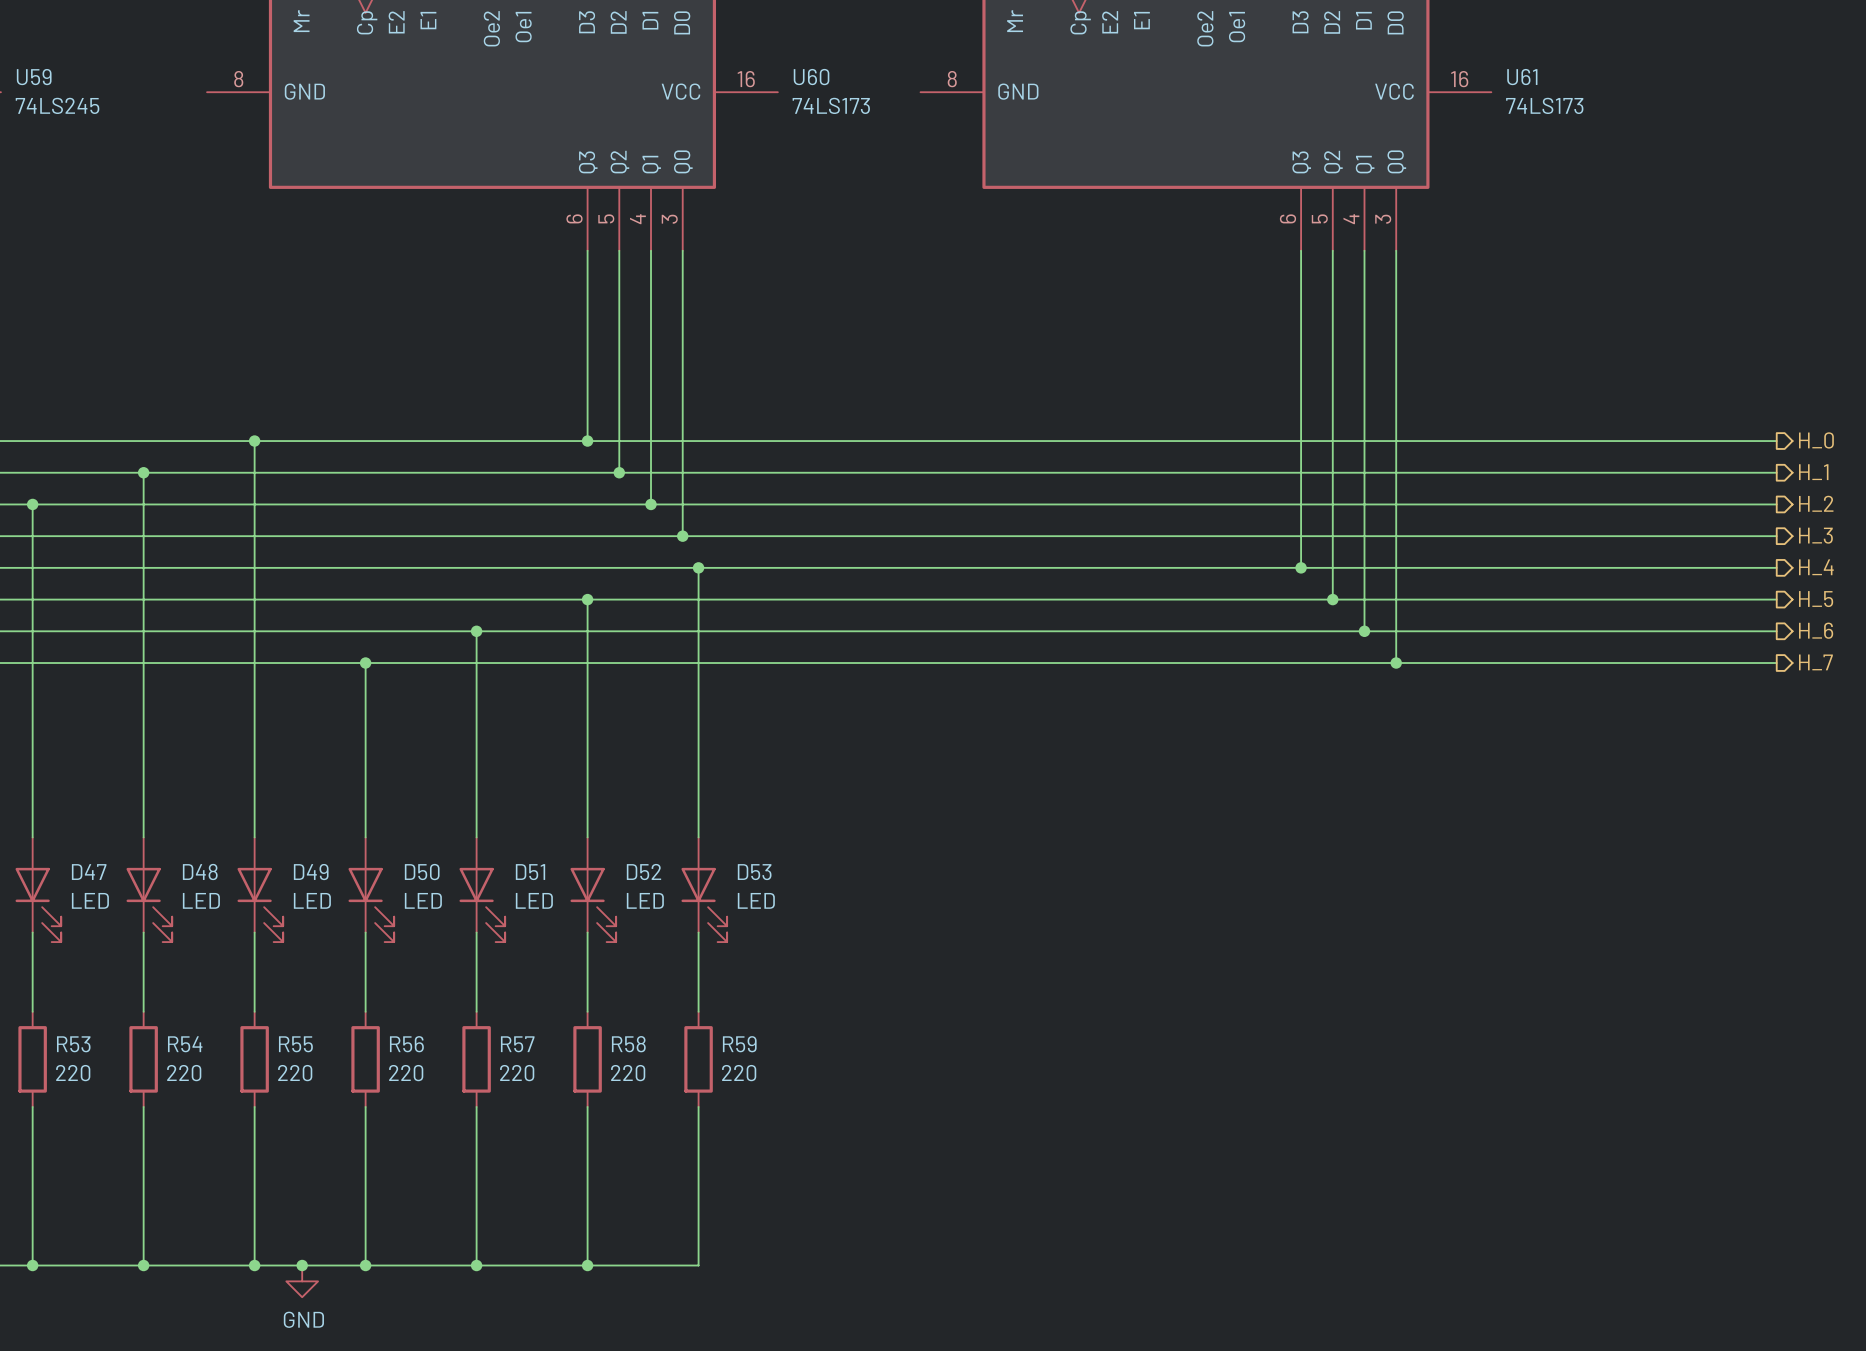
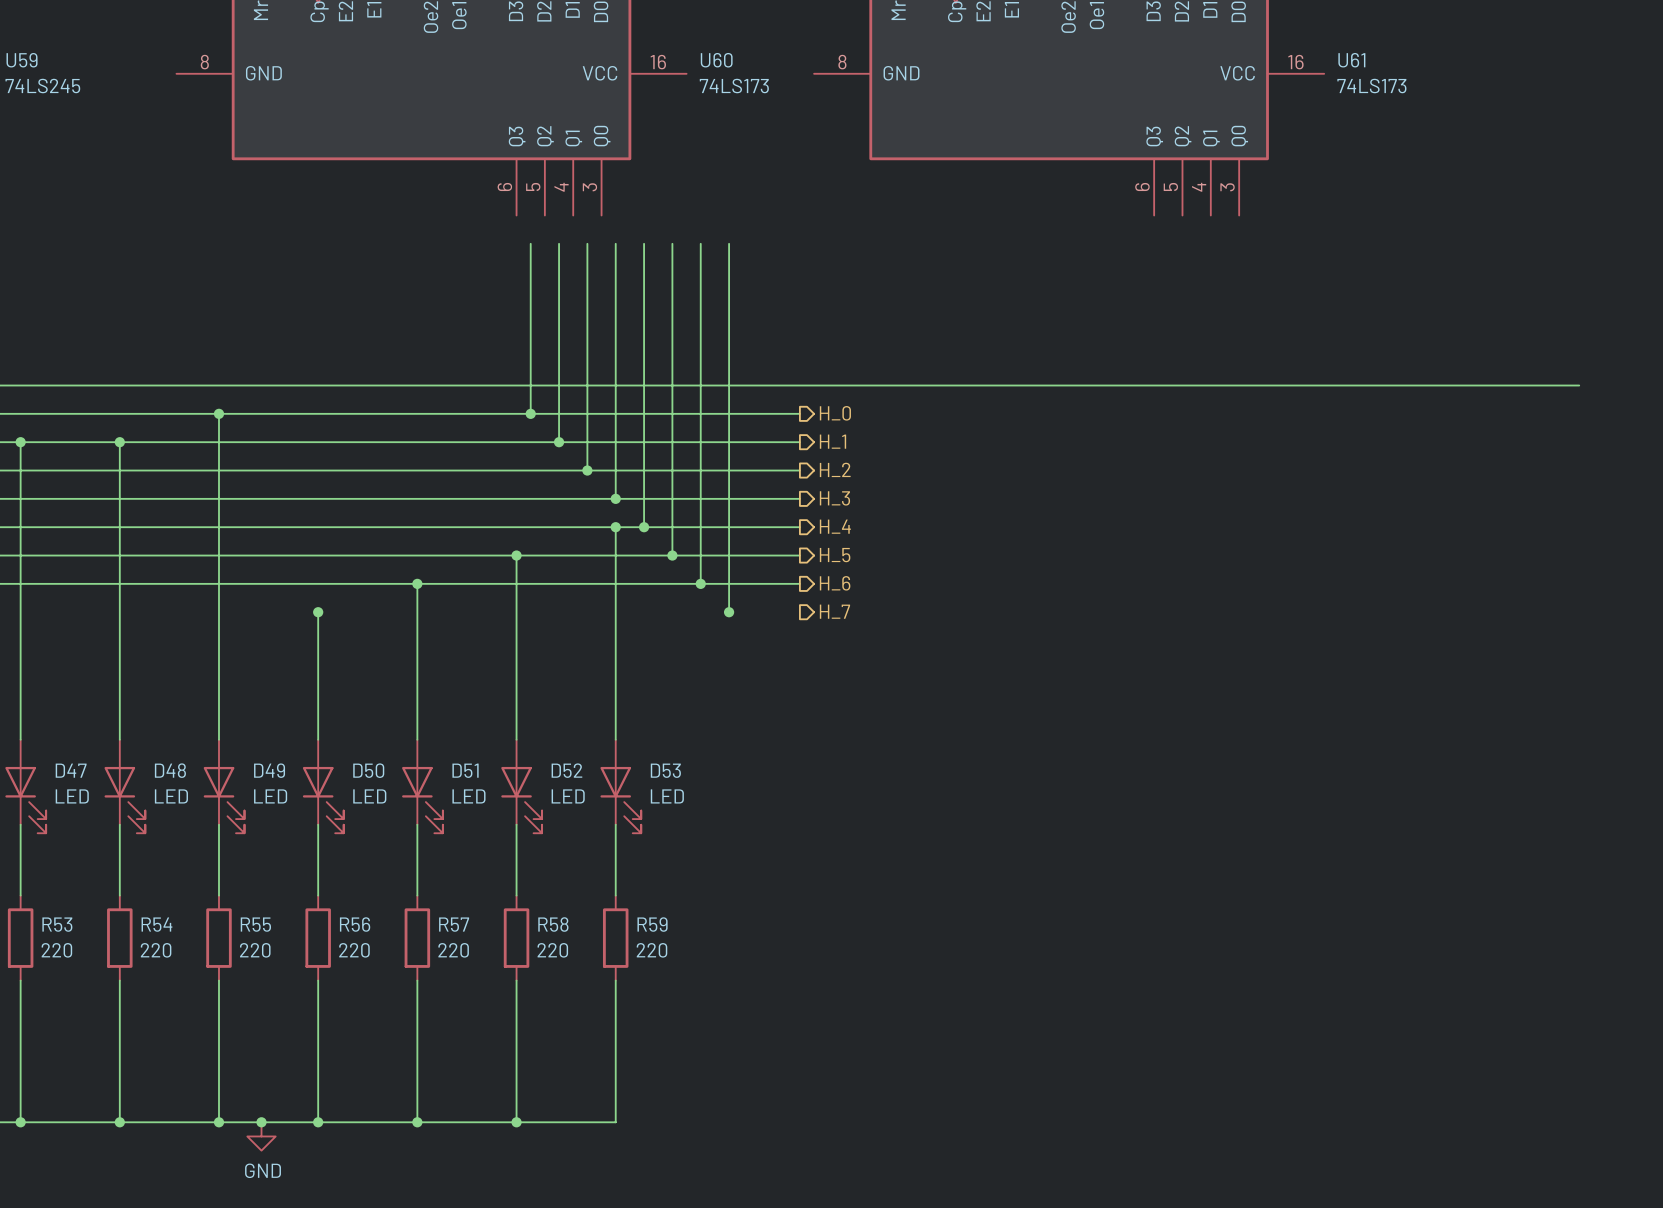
wire: (587, 250) (587, 441) -> (530, 243) (530, 413)
wire: (619, 250) (619, 472) -> (559, 243) (559, 442)
wire: (651, 250) (651, 504) -> (587, 243) (587, 470)
wire: (682, 250) (682, 536) -> none
wire: (1301, 250) (1301, 567) -> none
wire: (1332, 250) (1332, 599) -> none
wire: (1364, 250) (1364, 631) -> none
wire: (1396, 250) (1396, 663) -> none
wire: none -> (644, 243) (644, 527)
wire: none -> (672, 243) (672, 555)
wire: none -> (700, 243) (700, 583)
wire: none -> (729, 243) (729, 612)
hierarchical label: H_0 (1816, 440) -> none
wire: (254, 441) (254, 472) -> none
junction position: (254, 441) -> (219, 413)
junction: (587, 441) -> none
wire: (143, 472) (143, 504) -> none
junction position: (143, 472) -> (119, 442)
junction position: (619, 472) -> (530, 413)
wire: (904, 472) (1776, 472) -> none
hierarchical label: none -> H_0 (835, 413)
hierarchical label: H_1 (1813, 472) -> none
hierarchical label: none -> H_1 (832, 441)
hierarchical label: H_2 (1816, 503) -> none
junction position: (651, 504) -> (559, 442)
wire: (904, 504) (1776, 504) -> none
hierarchical label: none -> H_2 (835, 469)
hierarchical label: H_3 (1815, 535) -> none
junction position: (682, 536) -> (587, 470)
wire: (904, 536) (1776, 536) -> none
wire: (698, 567) (698, 599) -> (615, 498) (615, 243)
wire: (904, 567) (1776, 567) -> none
hierarchical label: none -> H_3 (834, 498)
junction: (1301, 567) -> none
hierarchical label: H_4 (1816, 567) -> none
hierarchical label: none -> H_4 (835, 526)
wire: (587, 599) (587, 631) -> none
junction position: (587, 599) -> (516, 555)
junction: none -> (615, 527)
junction: none -> (644, 527)
wire: (904, 599) (1776, 599) -> none
junction: (1332, 599) -> none
hierarchical label: H_5 (1816, 599) -> none
hierarchical label: none -> H_5 (835, 555)
hierarchical label: H_6 (1816, 630) -> none
wire: (476, 631) (476, 663) -> none
junction position: (476, 631) -> (417, 583)
junction: none -> (672, 555)
wire: (904, 631) (1776, 631) -> none
junction: (1364, 631) -> none
hierarchical label: none -> H_6 (835, 583)
hierarchical label: H_7 (1815, 662) -> none
wire: (365, 663) (365, 694) -> none
junction position: (365, 663) -> (318, 612)
junction: none -> (700, 583)
wire: (904, 663) (1776, 663) -> none
junction: (1396, 663) -> none
junction: none -> (729, 612)
hierarchical label: none -> H_7 (834, 611)

